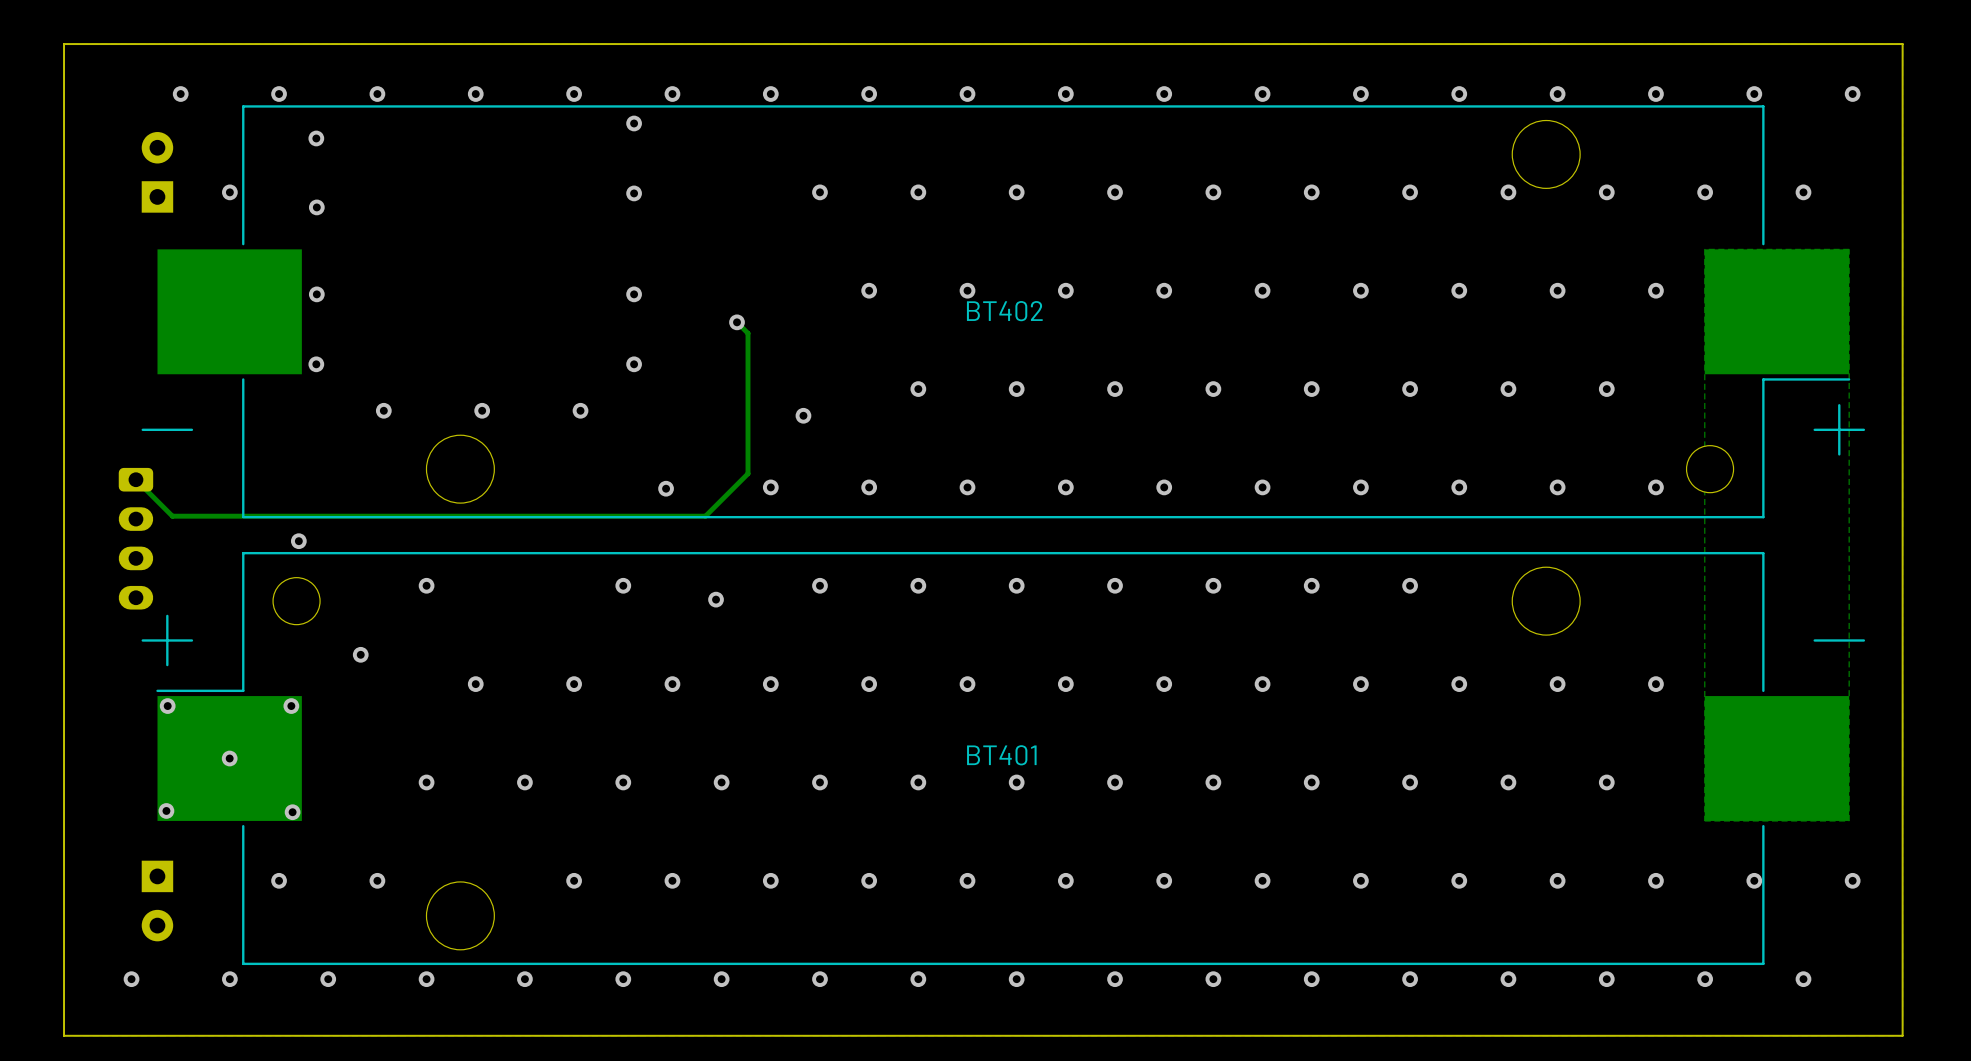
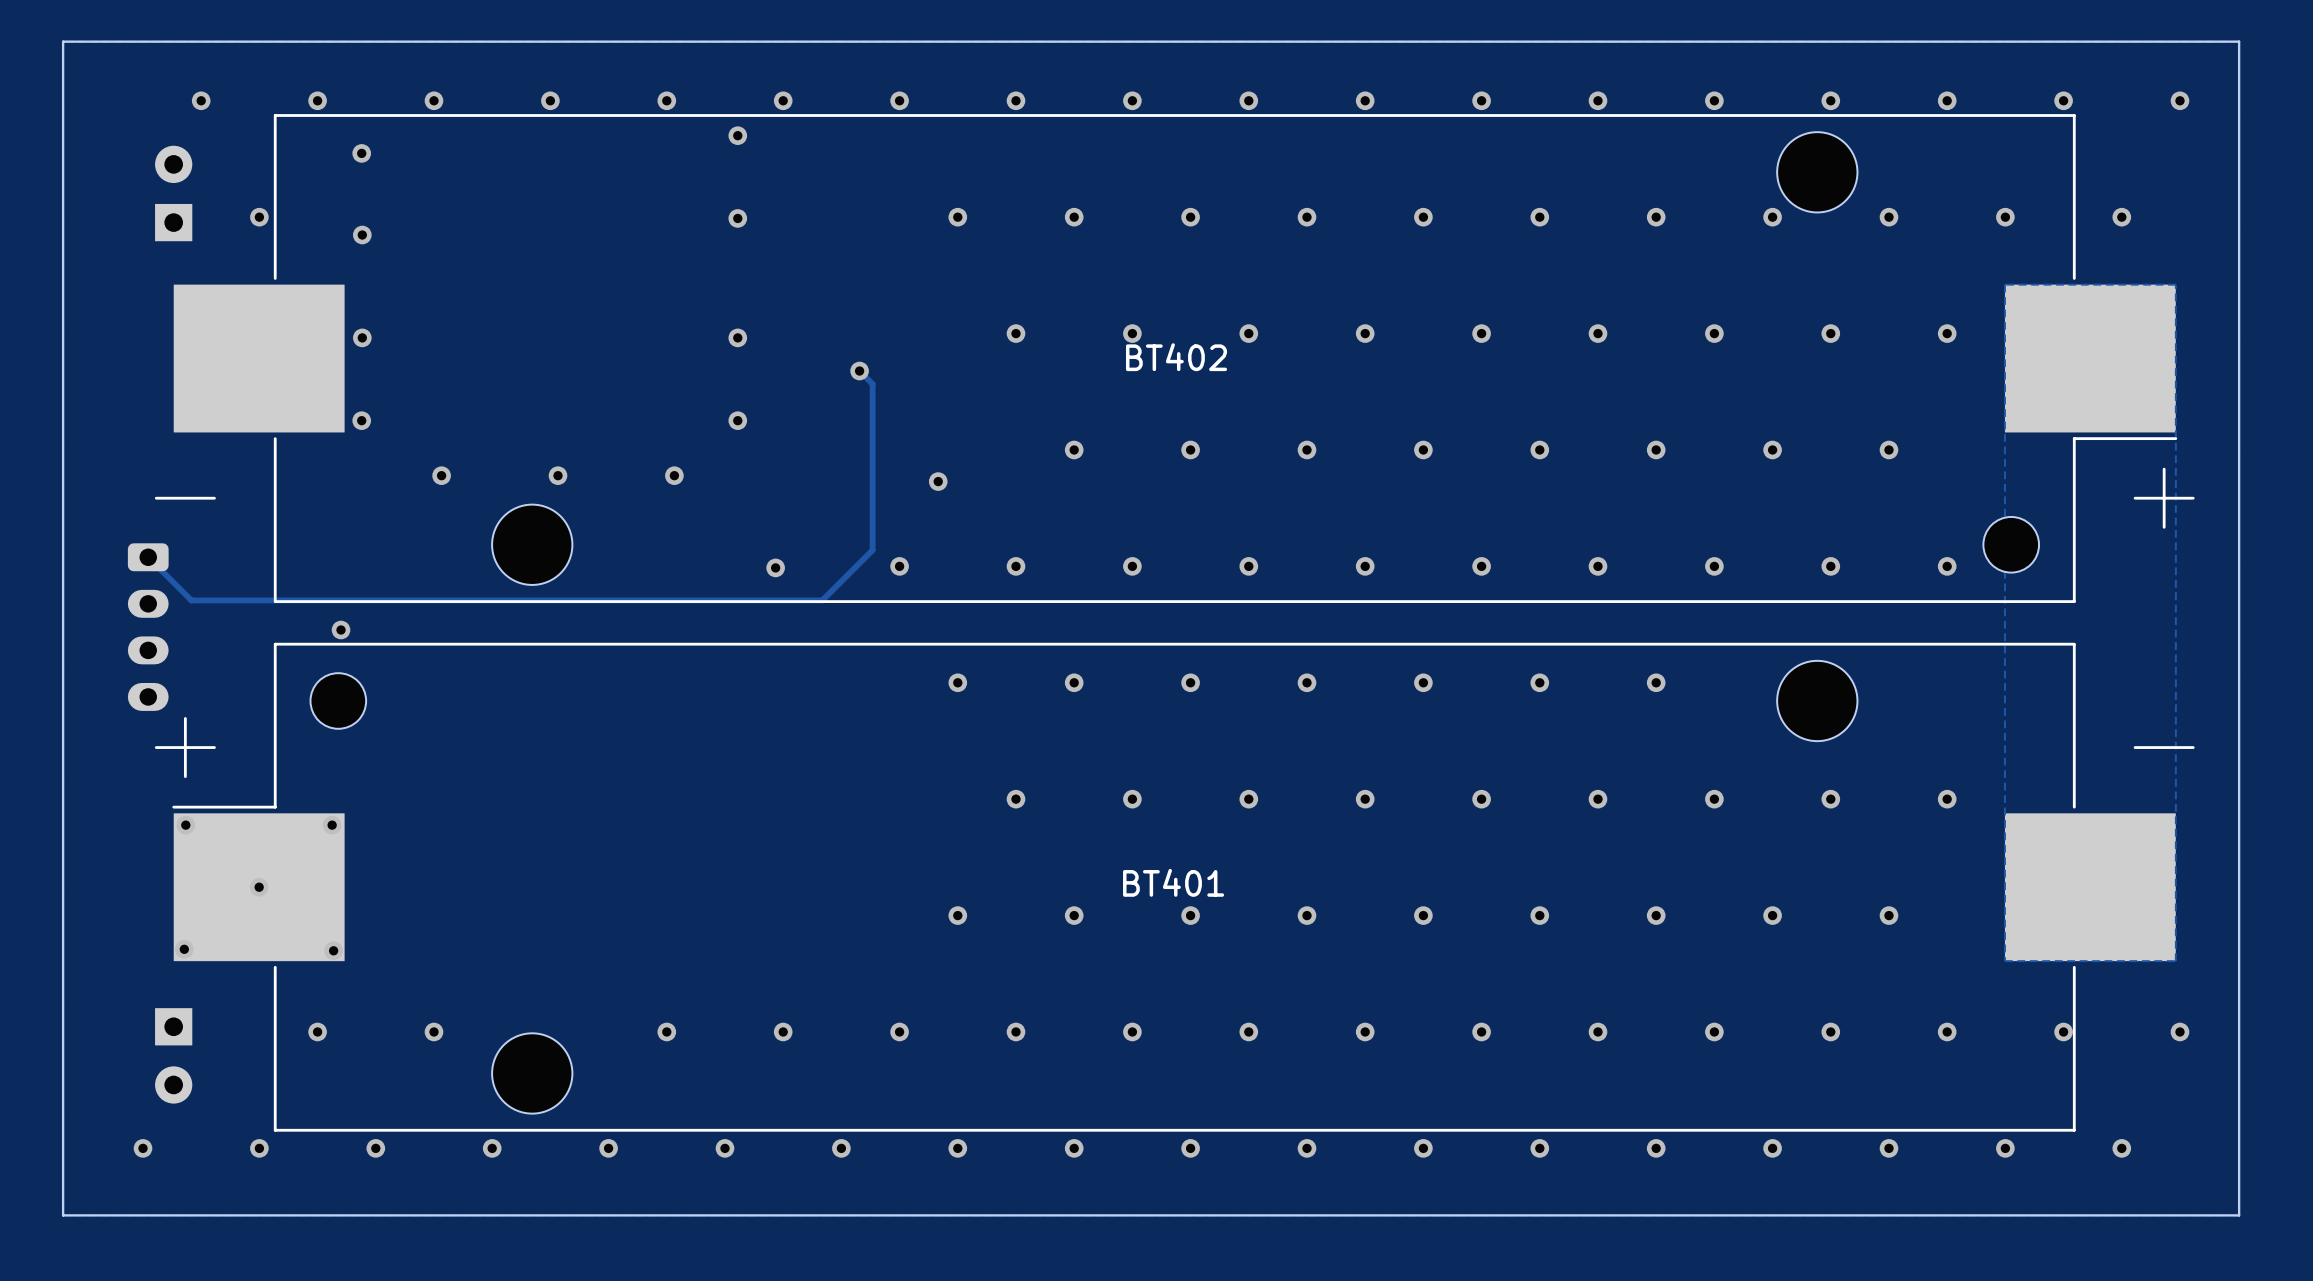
via: (426, 585) -> none
via: (623, 585) -> none
via: (716, 599) -> none
via: (360, 654) -> none
via: (475, 684) -> none
via: (574, 684) -> none
via: (672, 684) -> none
via: (770, 684) -> none
via: (426, 782) -> none
via: (524, 782) -> none
via: (623, 782) -> none
via: (721, 782) -> none

